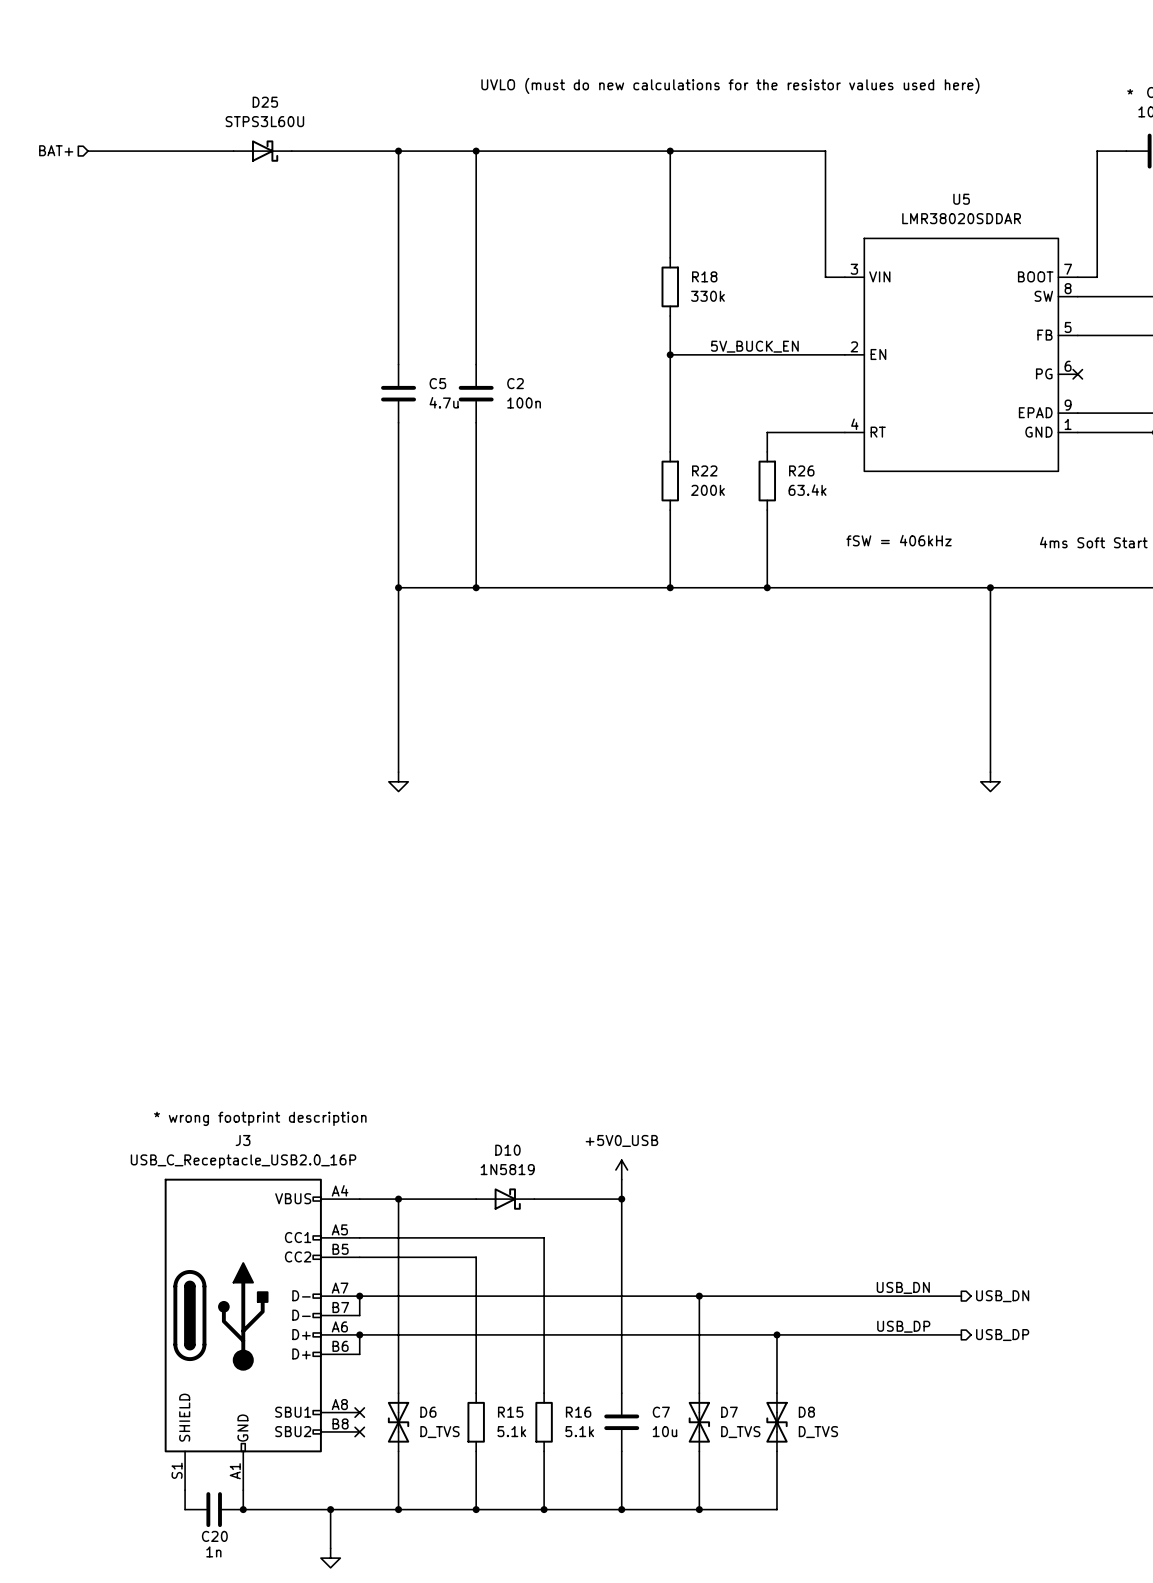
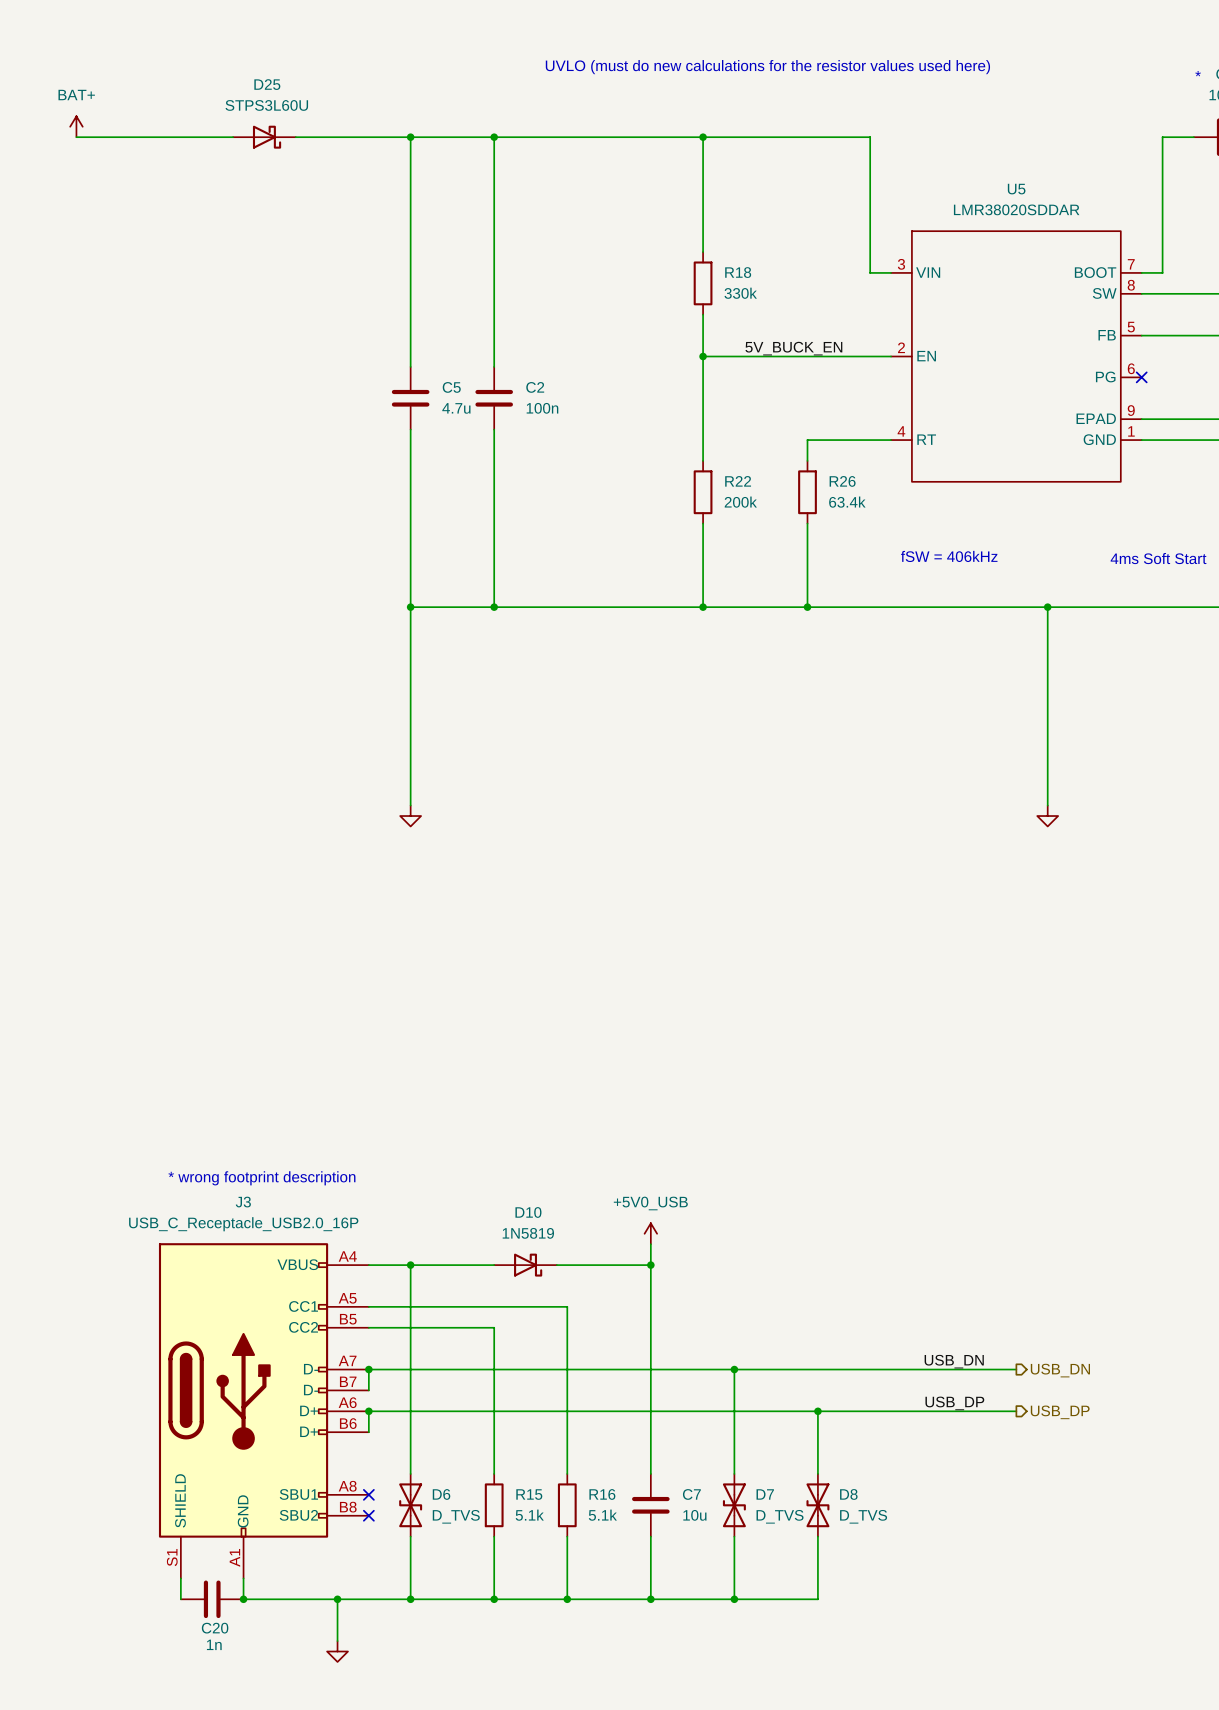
power symbol: none -> BAT+ (76, 126)
hierarchical label: BAT+ (56, 150) -> none

